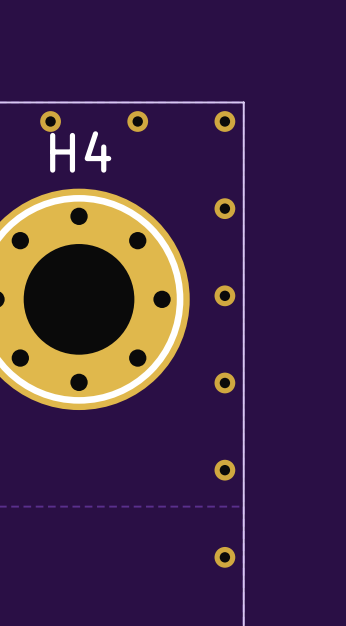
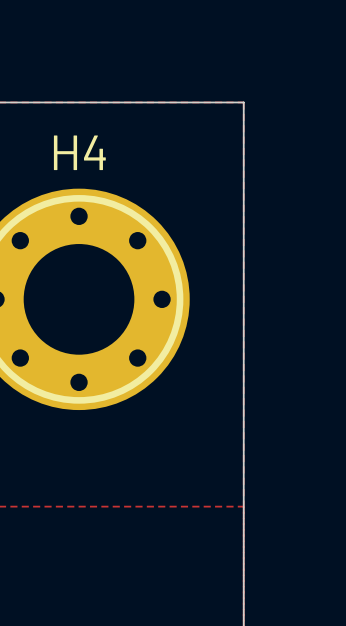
via: (50, 121) -> none
via: (137, 121) -> none
via: (224, 121) -> none
via: (224, 208) -> none
via: (224, 295) -> none
via: (224, 382) -> none
via: (224, 470) -> none
via: (224, 557) -> none

